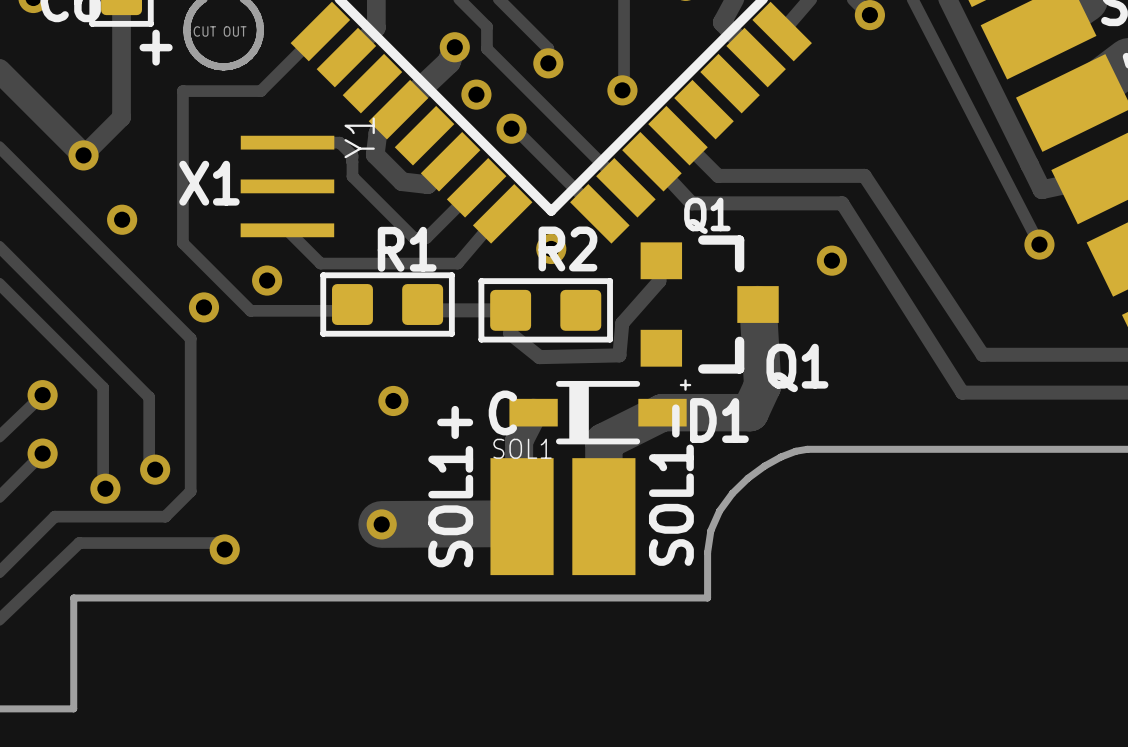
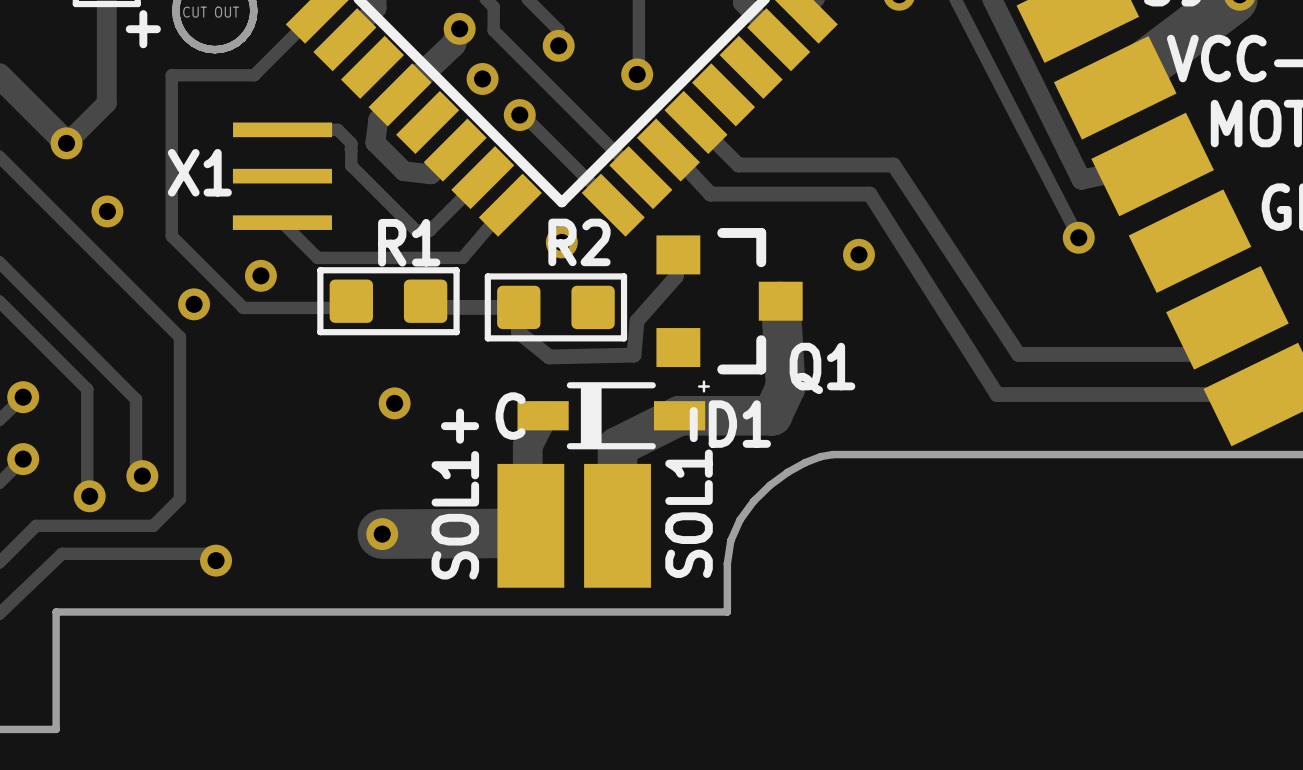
Y1 name: Y1 (359, 137) -> none
Q1 name: Q1 (707, 215) -> none
SOL1 name: SOL1 (522, 448) -> none

